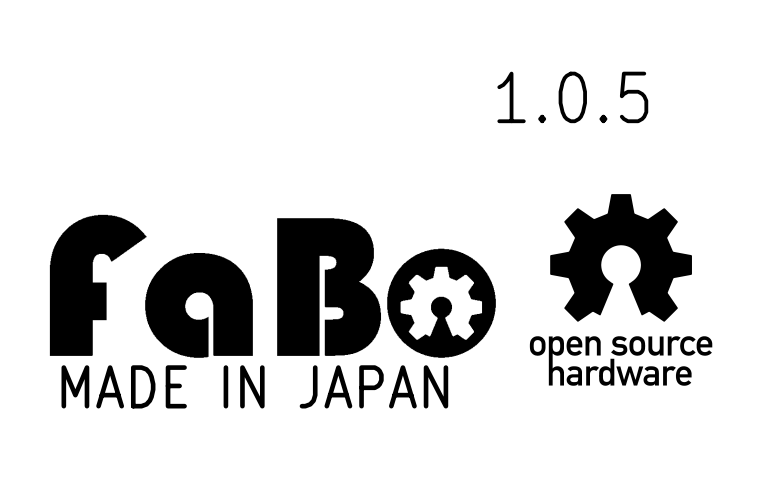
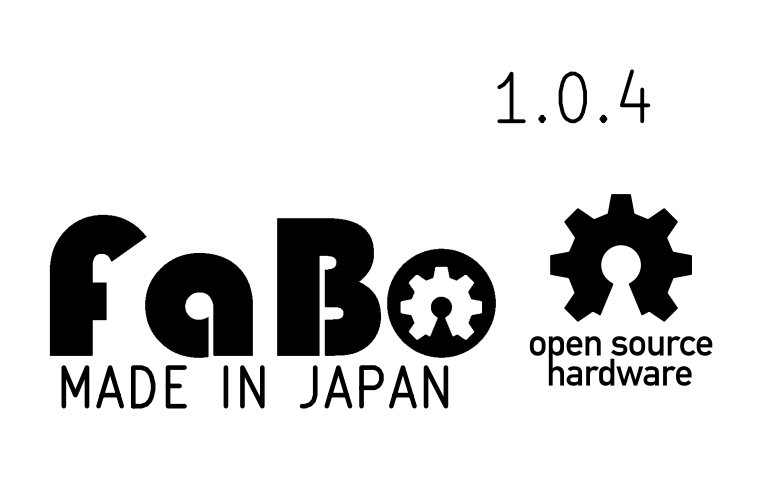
text: 1.0.5 (572, 97) -> 1.0.4 (573, 96)

